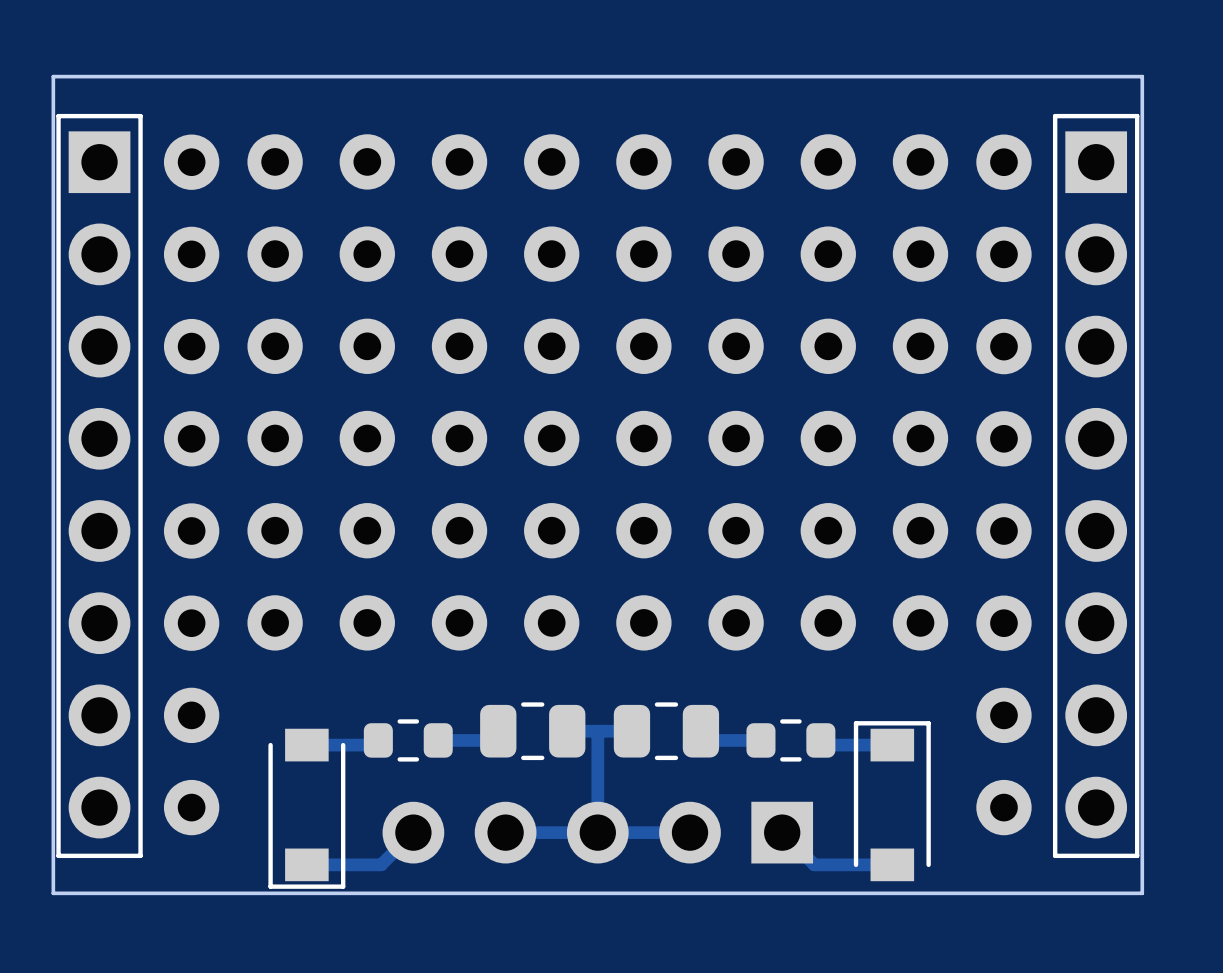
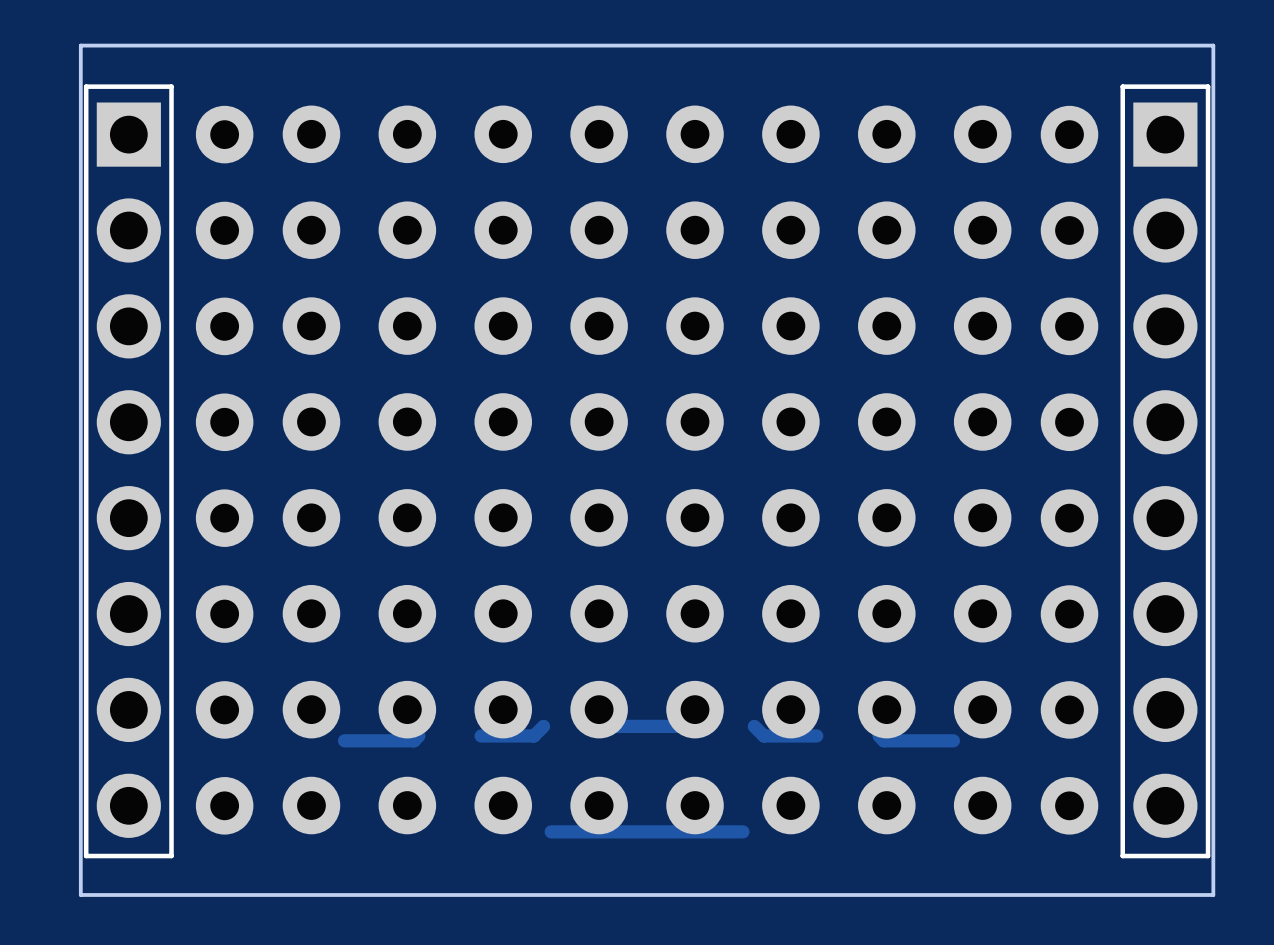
part footprint: [480, 702, 586, 761] -> [570, 680, 628, 739]
part footprint: [613, 702, 720, 761] -> [666, 680, 724, 739]
part: none -> (311, 709)
part: none -> (407, 709)
part: none -> (503, 709)
part: none -> (790, 709)
part: none -> (886, 709)
part: none -> (982, 709)
part footprint: [853, 721, 931, 882] -> [953, 776, 1012, 835]
track: (601, 731) (597, 735) (597, 832) -> none
part: (408, 740) -> none
part: (790, 740) -> none
part: none -> (311, 805)
part: none -> (407, 805)
part: none -> (503, 805)
part: none -> (599, 805)
part: none -> (695, 805)
part: none -> (790, 805)
part: none -> (886, 805)
part: (306, 808) -> none
track: (413, 832) (381, 864) (306, 864) -> none
part: (597, 832) -> none
track: (782, 832) (814, 864) (892, 864) -> none

